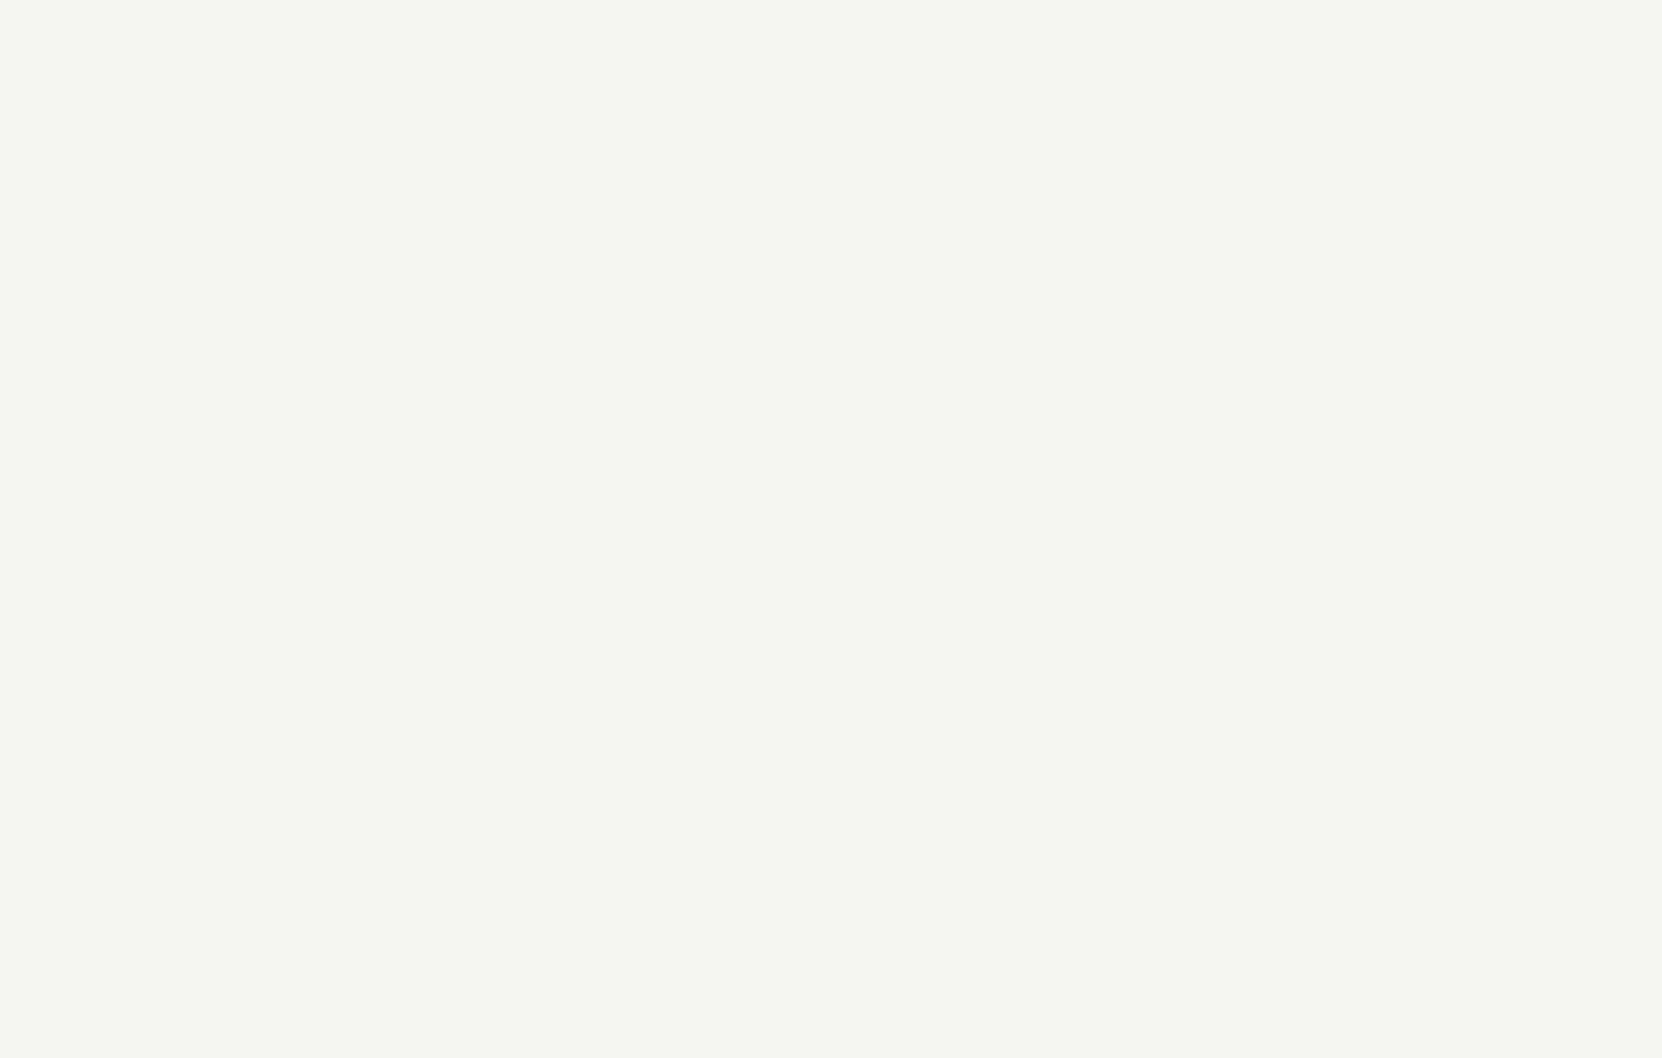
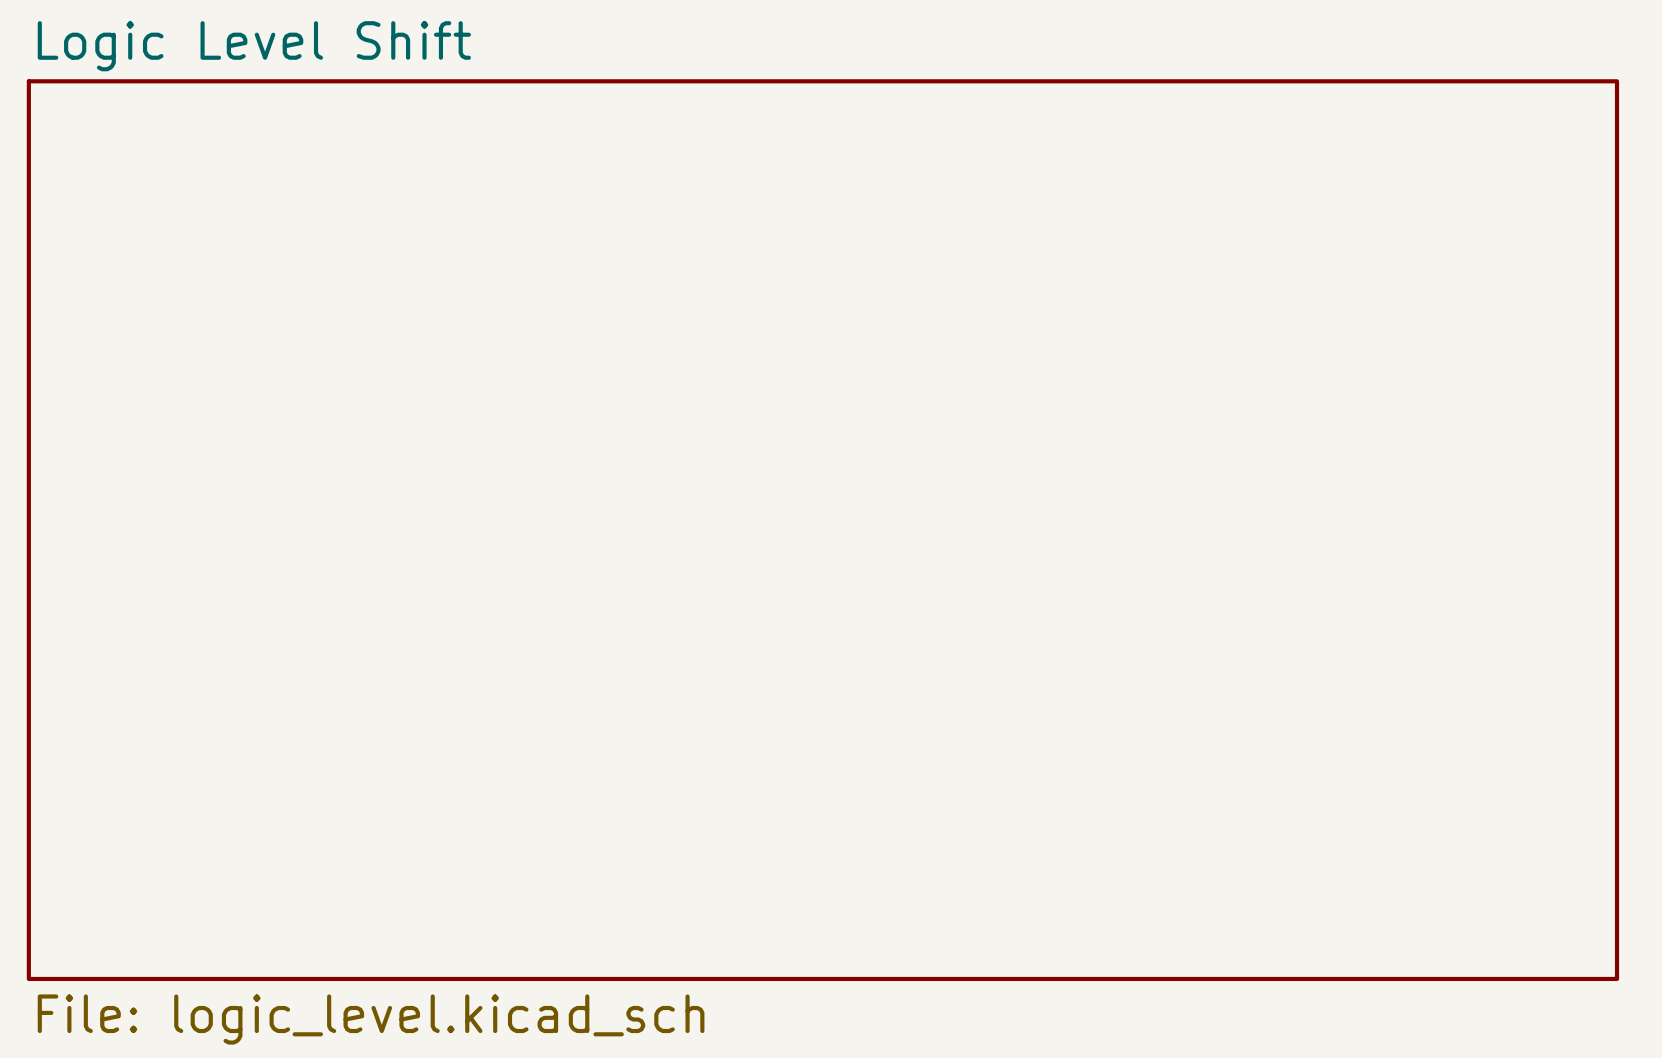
sheet Logic Level Shift: none -> File: logic_level.kicad_sch (822, 530)

